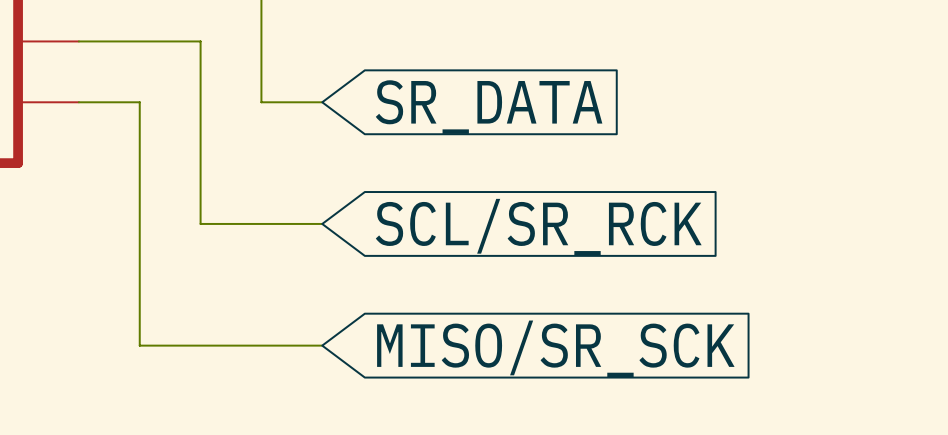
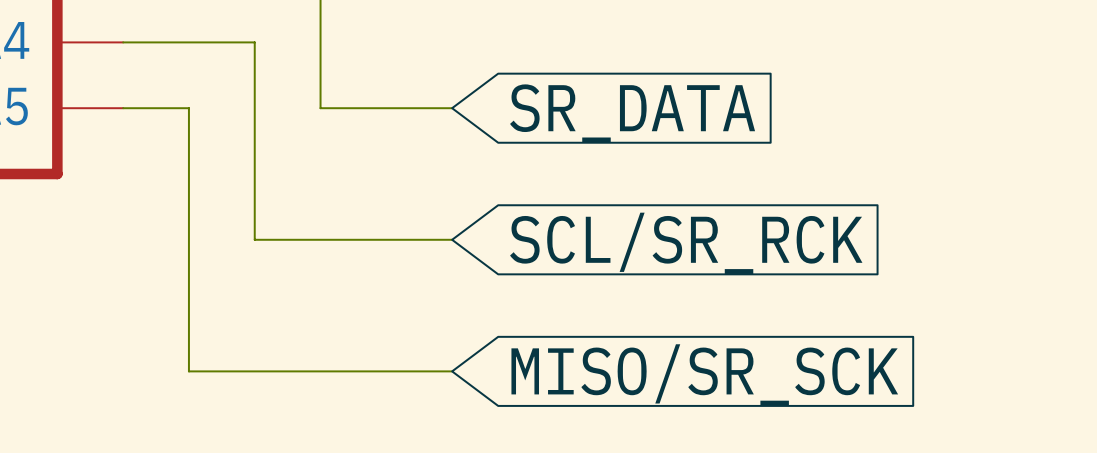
wire: none -> (386, 108) (452, 108)
global label position: SR_DATA (489, 107) -> SR_DATA (632, 113)
wire: none -> (386, 239) (452, 239)
global label position: SCL/SR_RCK (538, 227) -> SCL/SR_RCK (686, 243)
wire: none -> (386, 371) (452, 371)
global label position: MISO/SR_SCK (555, 348) -> MISO/SR_SCK (704, 374)

